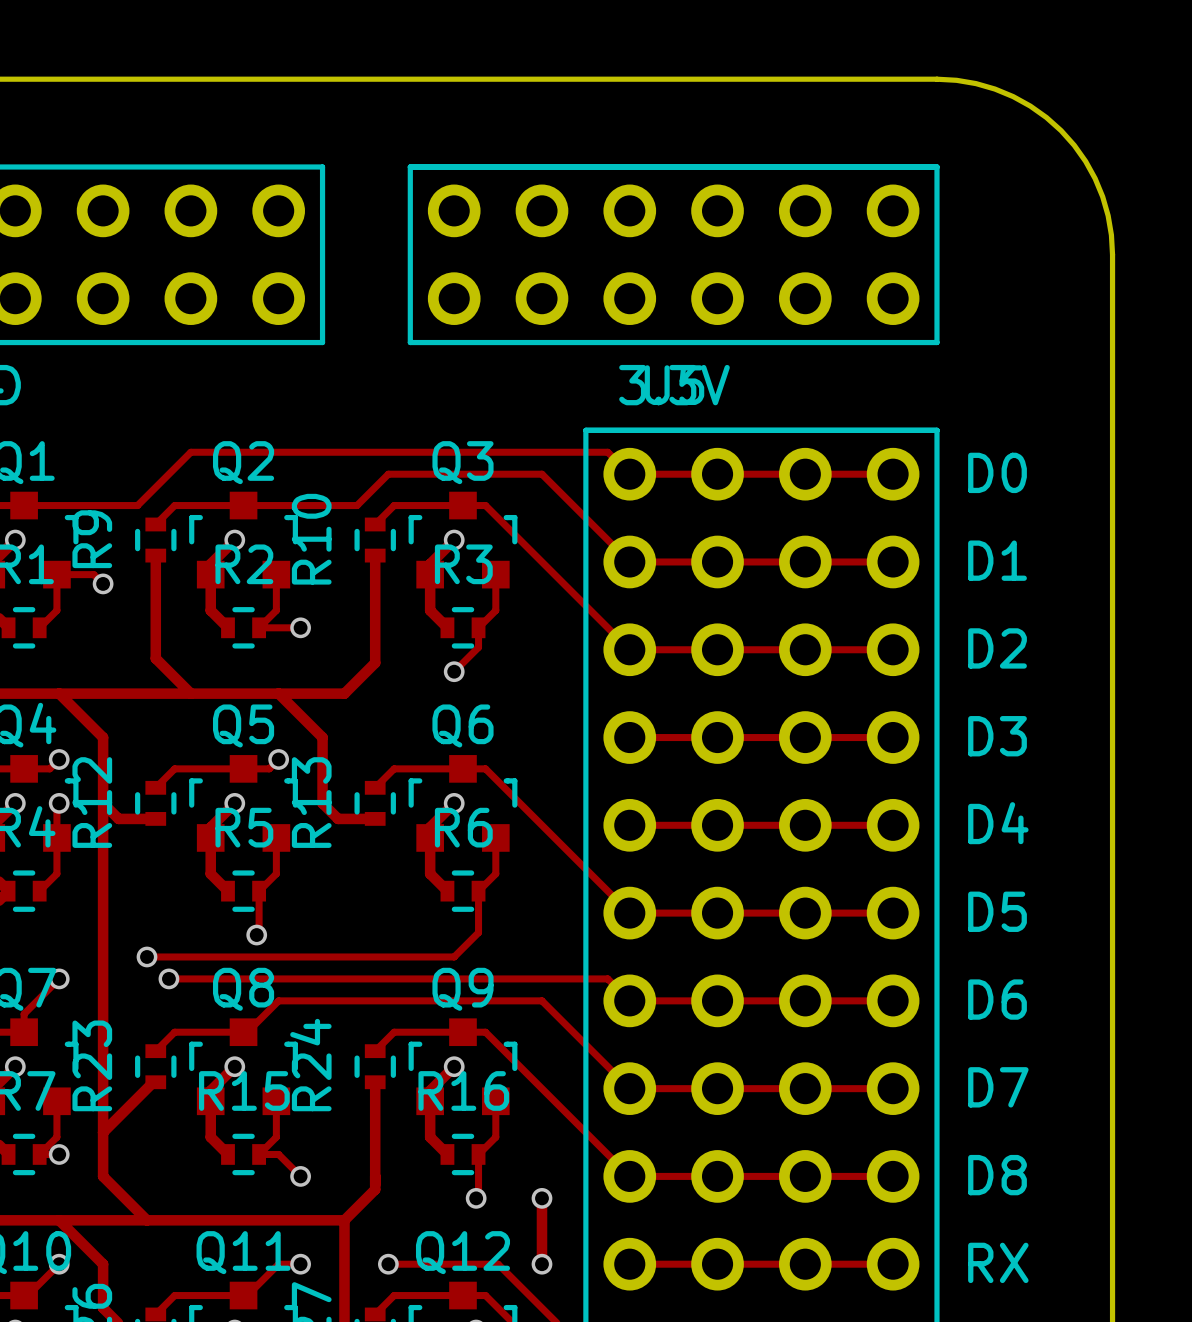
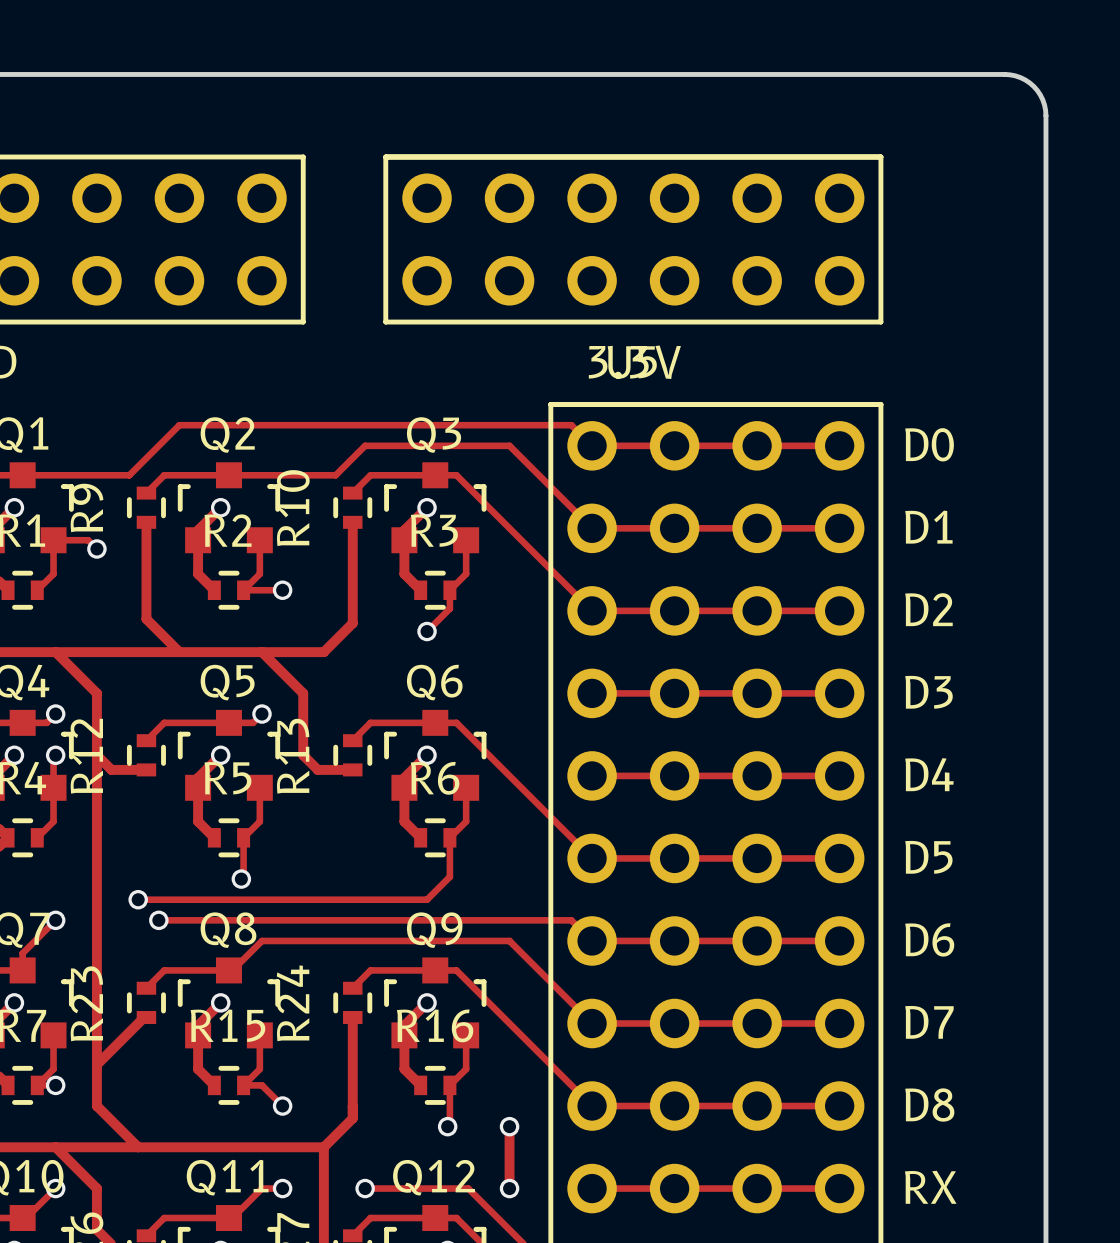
board edge: (936, 79) (976, 83) (1013, 96) (1046, 117) (1061, 130) (1074, 145) (1095, 178) (1108, 215) (1112, 254) -> (880, 74) (1010, 74) (1025, 79) (1033, 86) (1042, 99) (1045, 110) (1045, 239)

